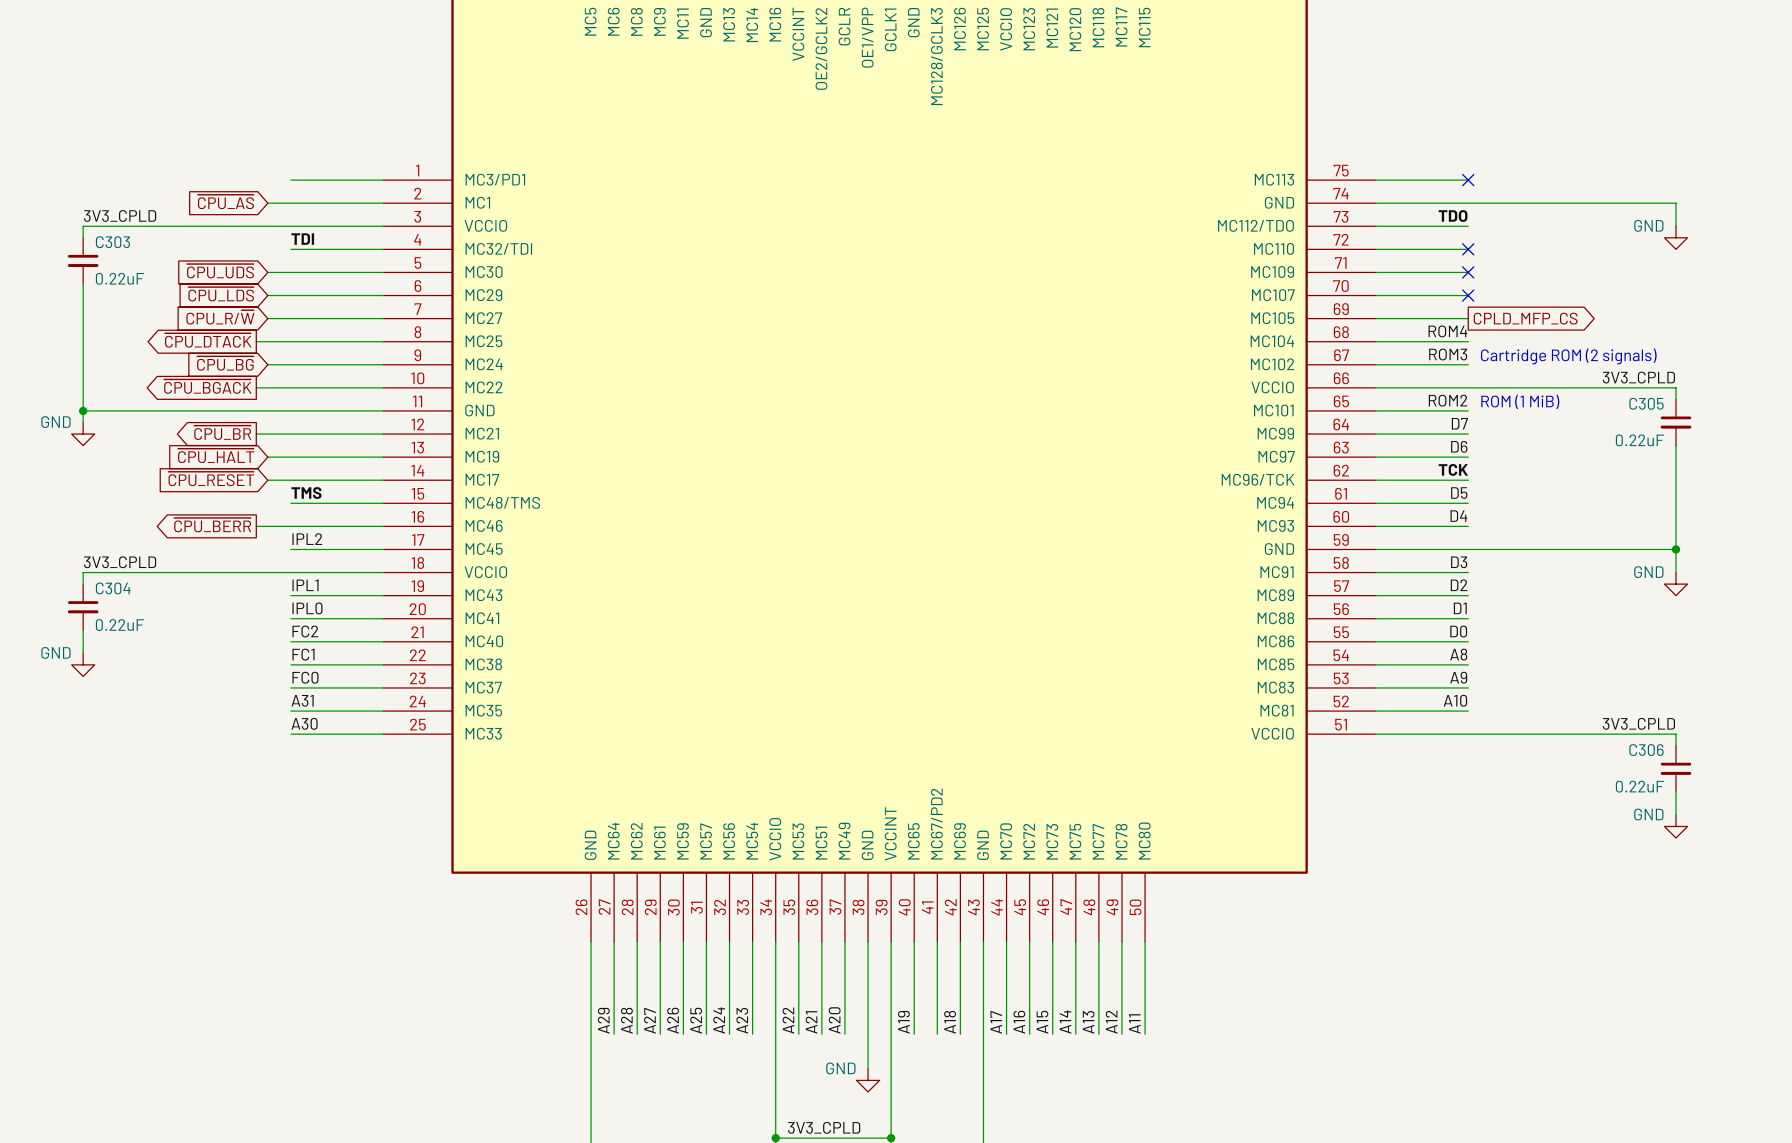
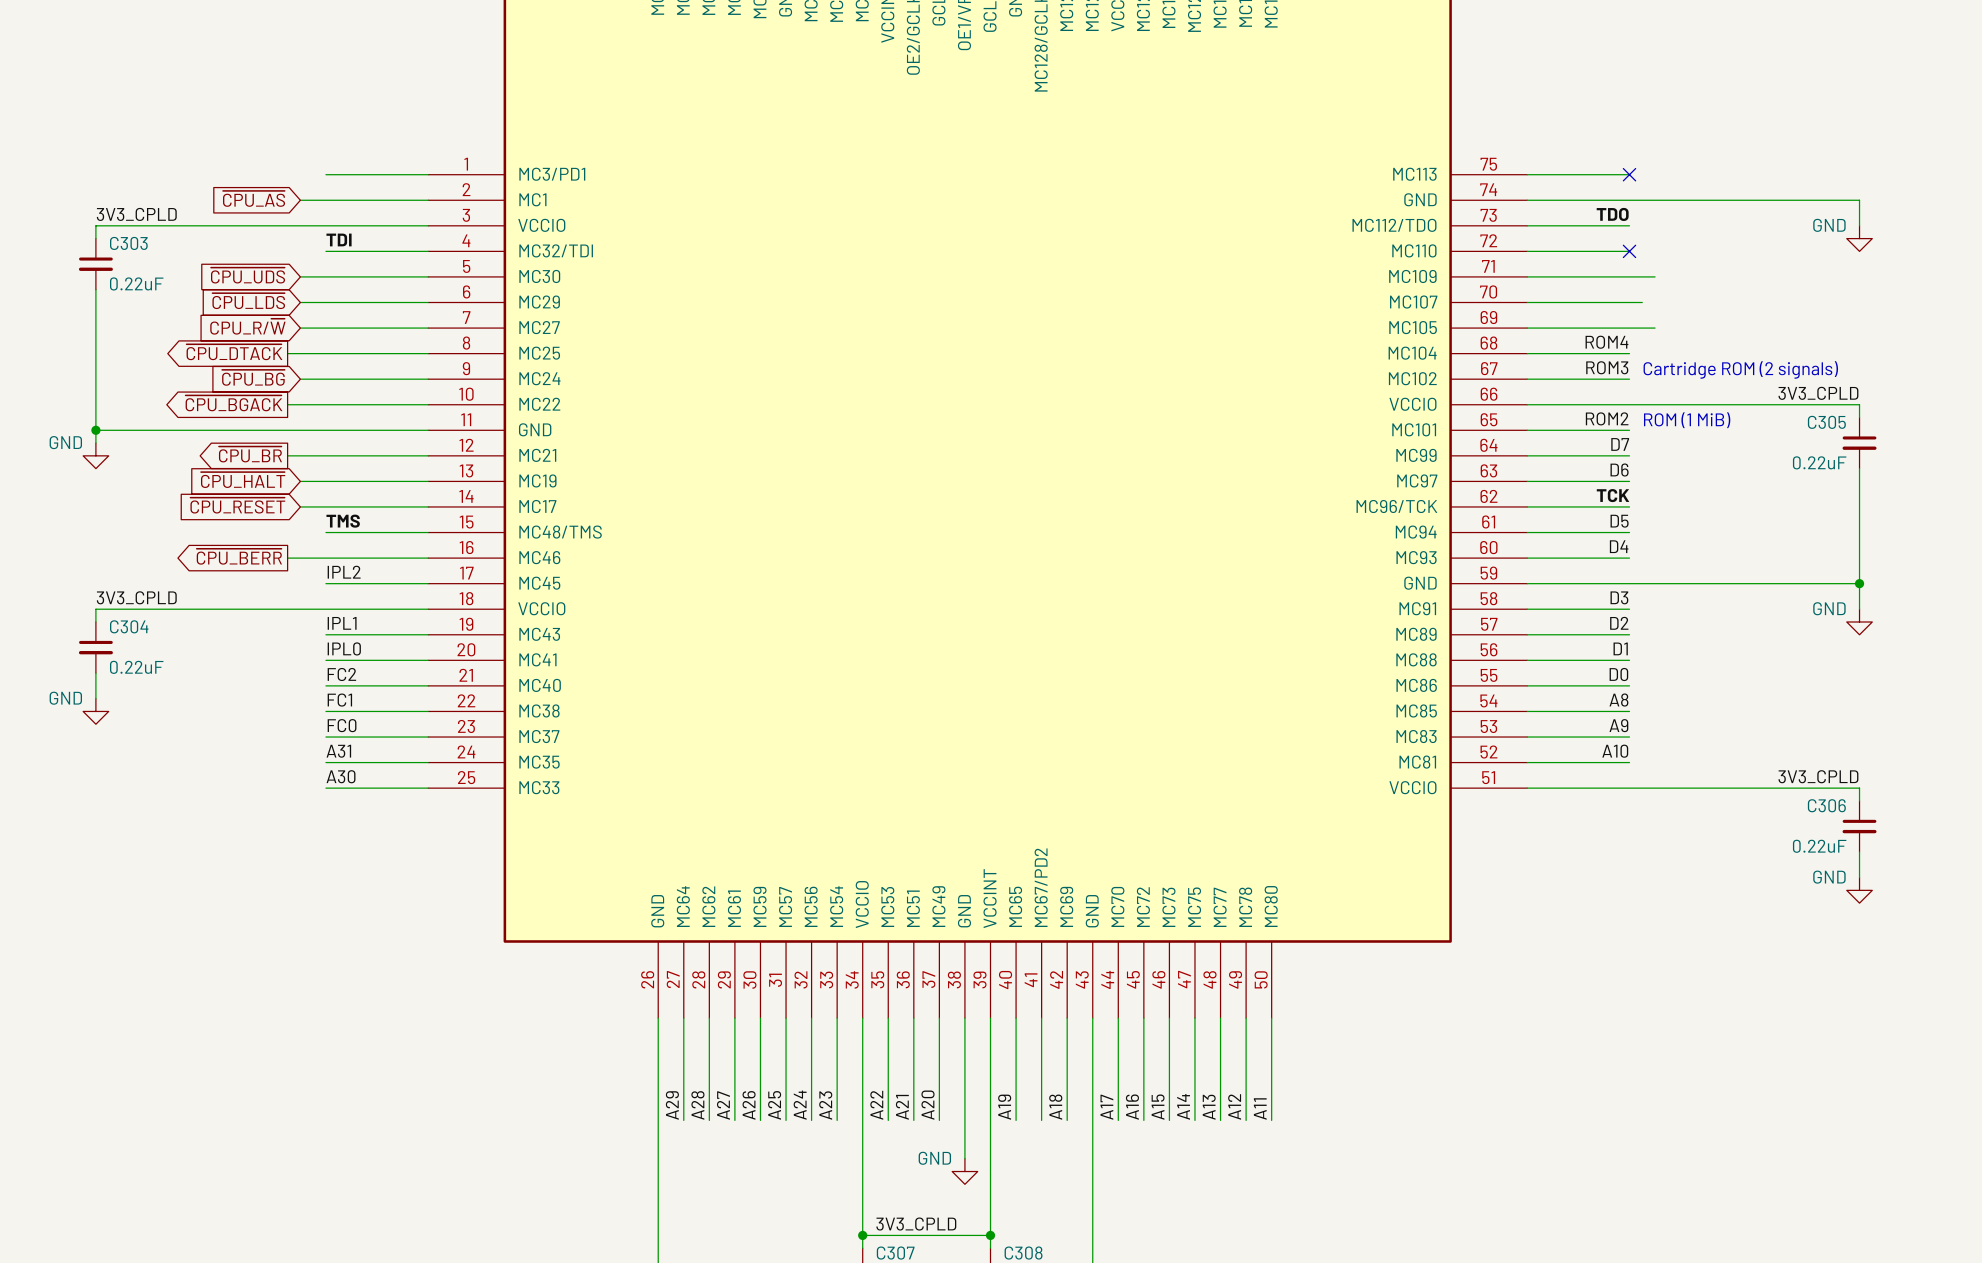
wire: none -> (1629, 276) (1655, 276)
no-connect mark: (1468, 272) -> none
wire: none -> (1629, 302) (1642, 302)
no-connect mark: (1468, 295) -> none
wire: none -> (1629, 328) (1655, 328)
global label: CPLD_MFP_CS (1525, 318) -> none

